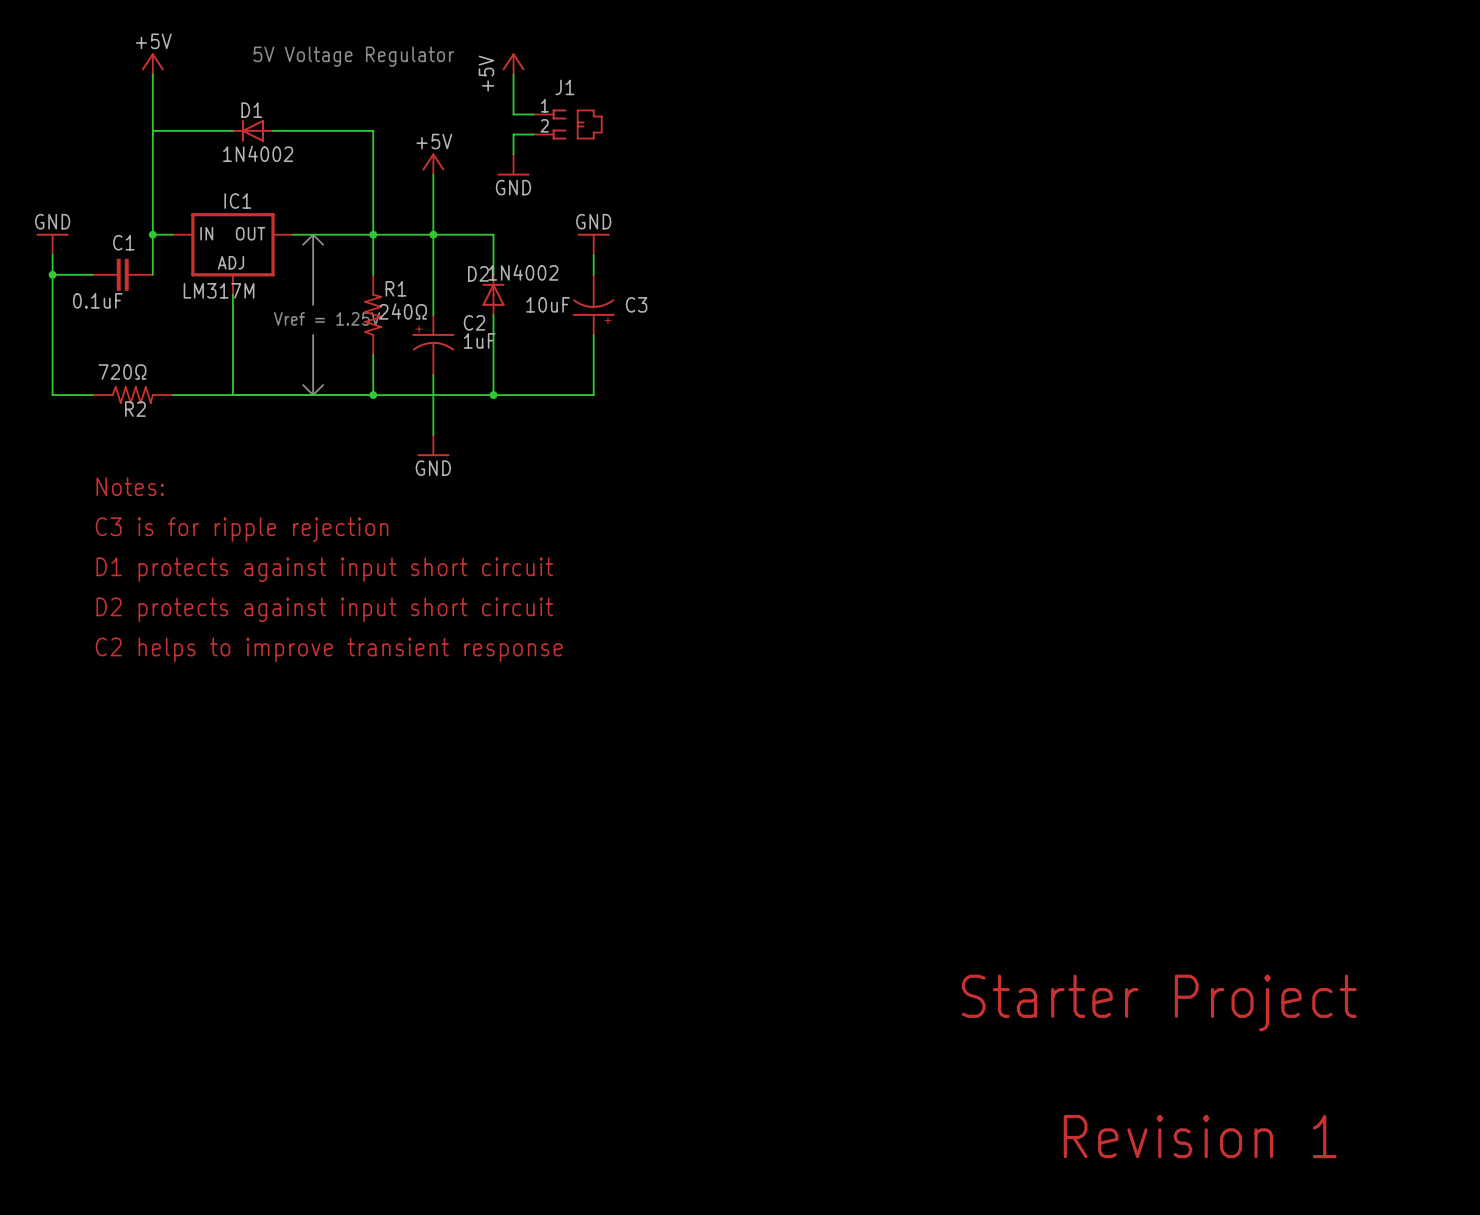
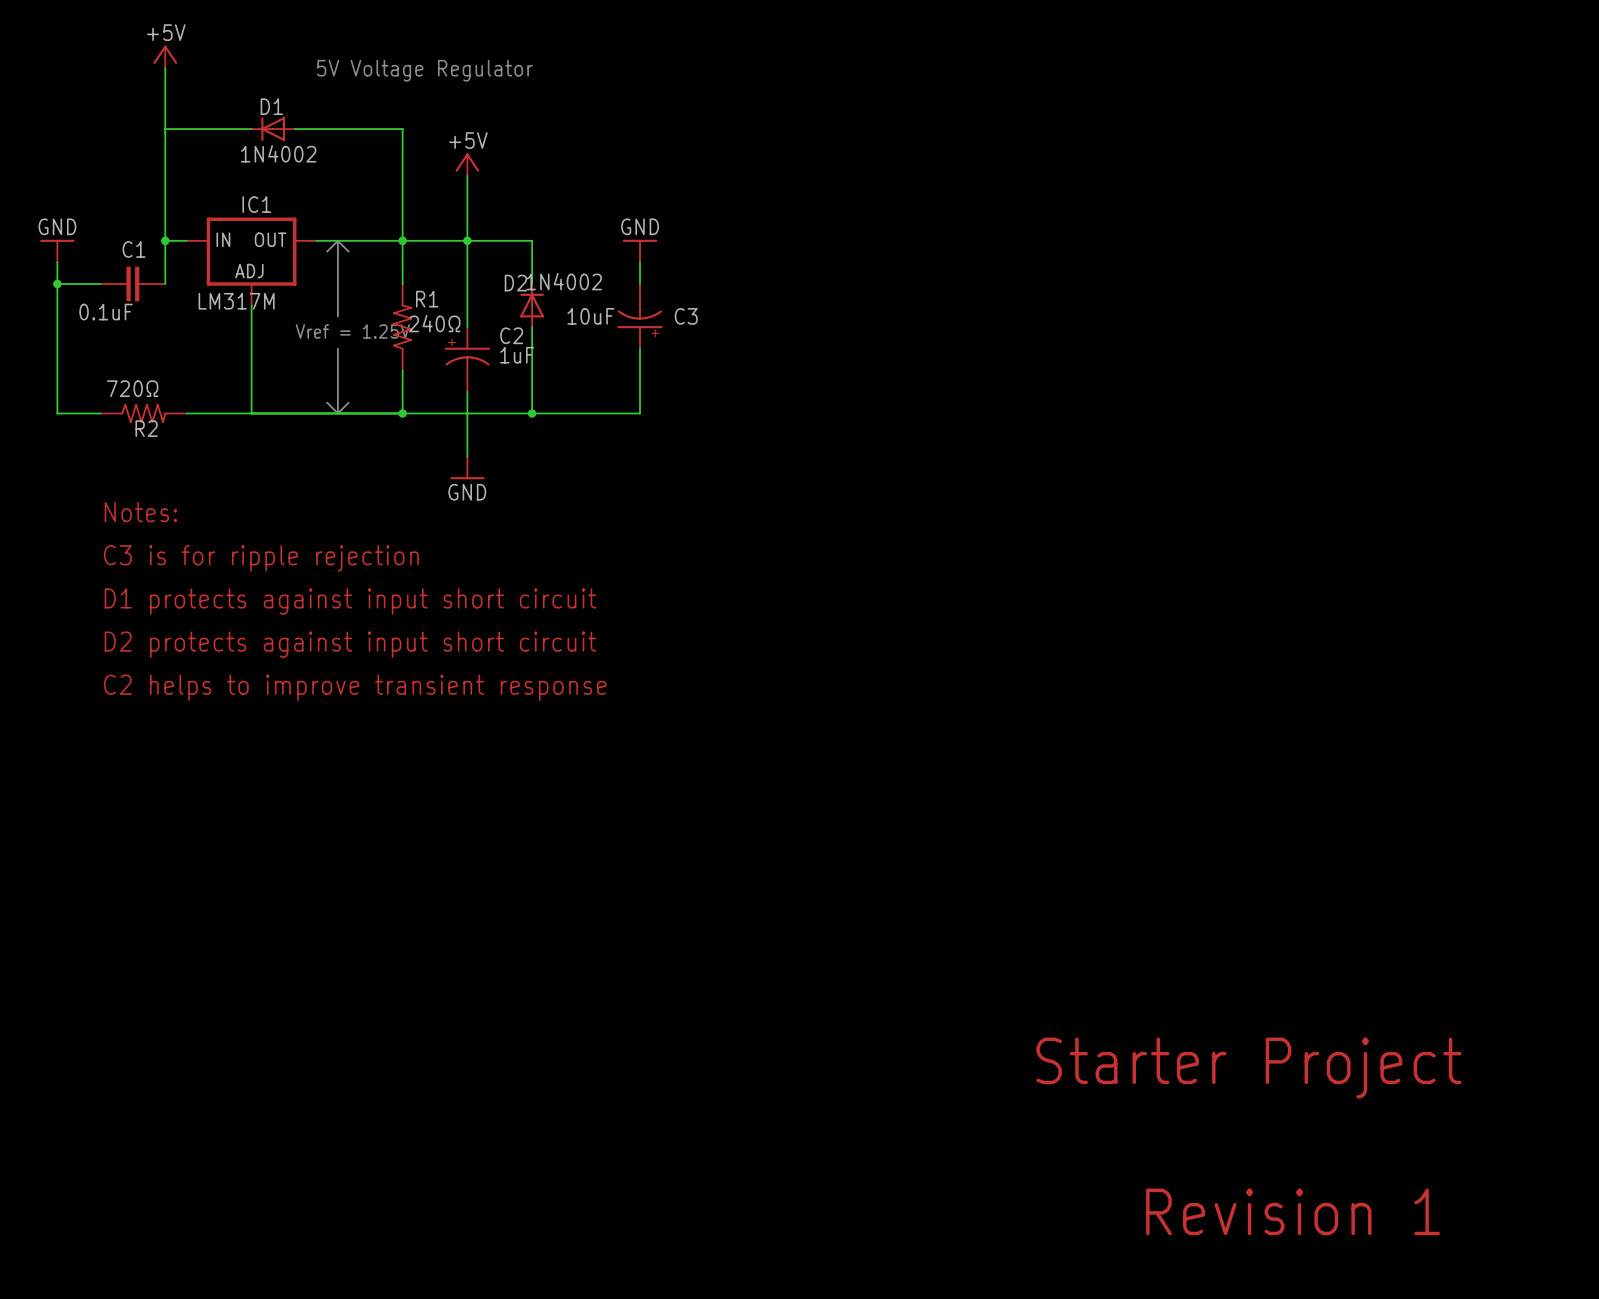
text position: 5V Voltage Regulator (353, 56) -> 5V Voltage Regulator (424, 70)
power symbol: +5V (513, 63) -> none
wire: (513, 74) (513, 114) (533, 114) -> none
J1: (568, 124) -> none
wire: (533, 134) (513, 134) (513, 154) -> none
power symbol: GND (513, 165) -> none

